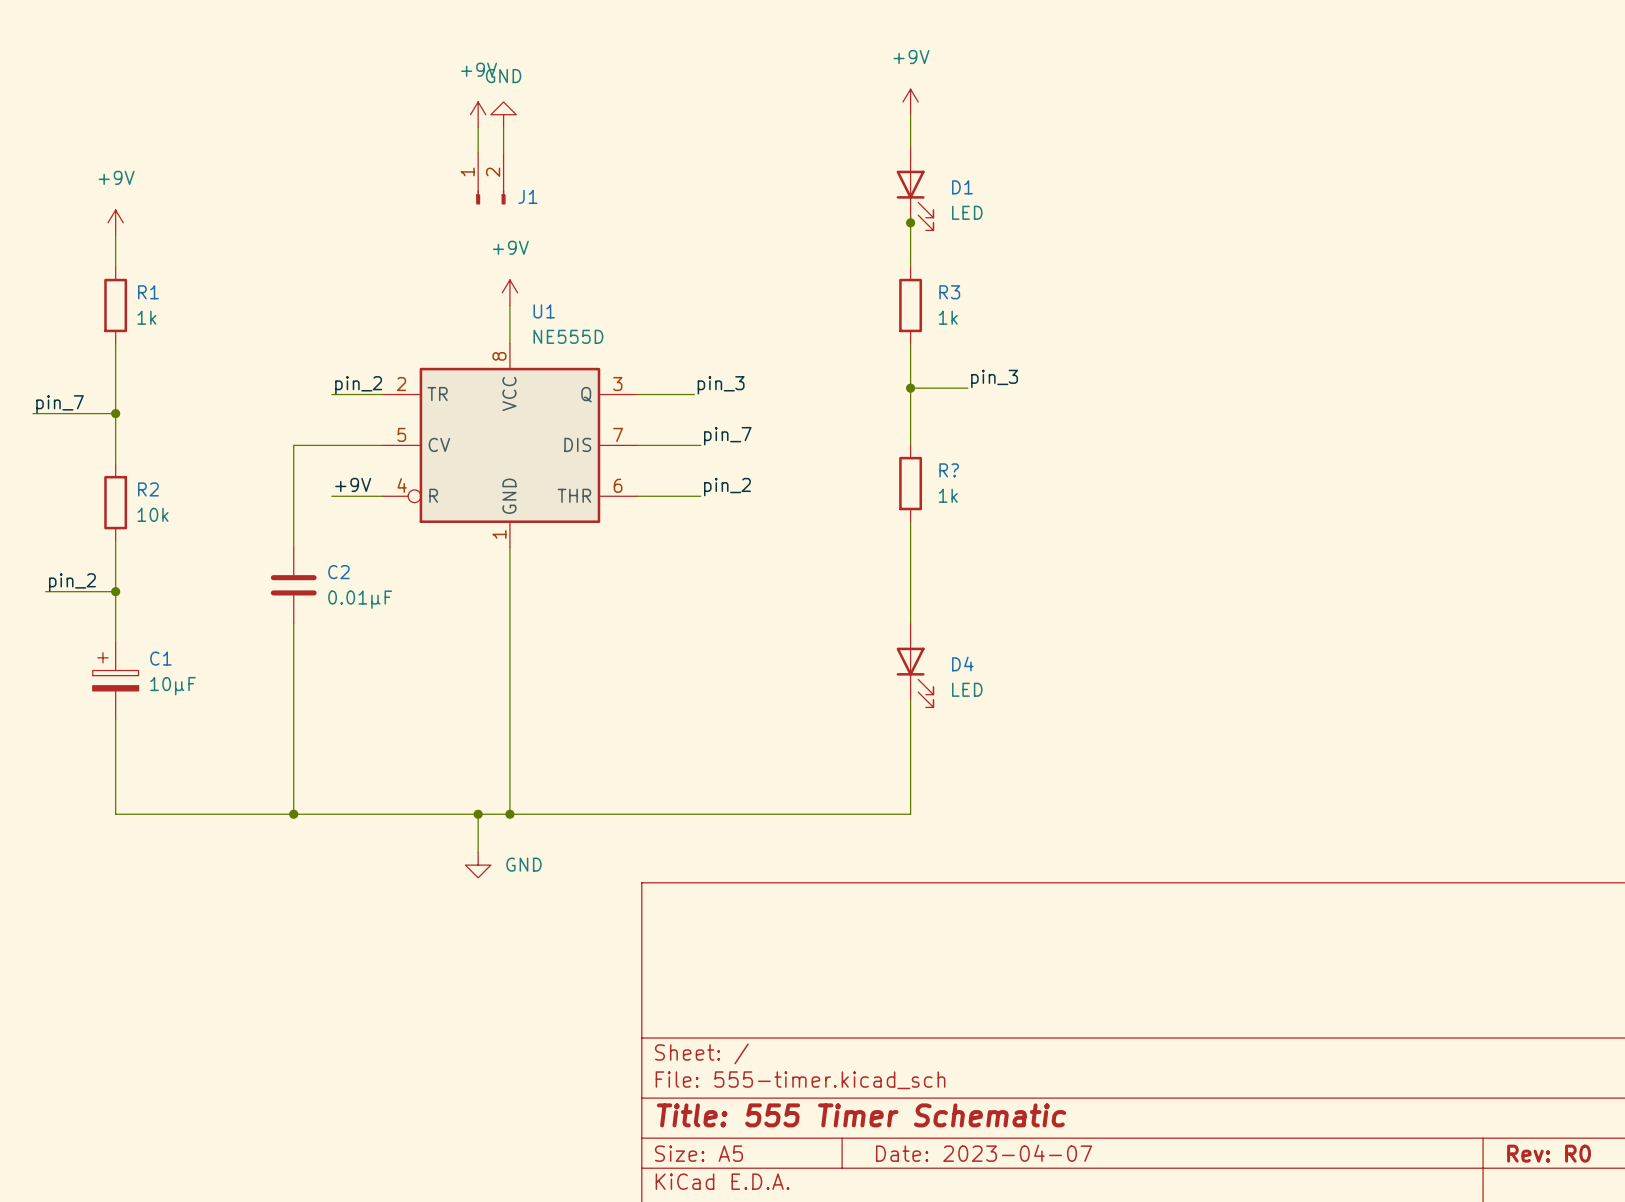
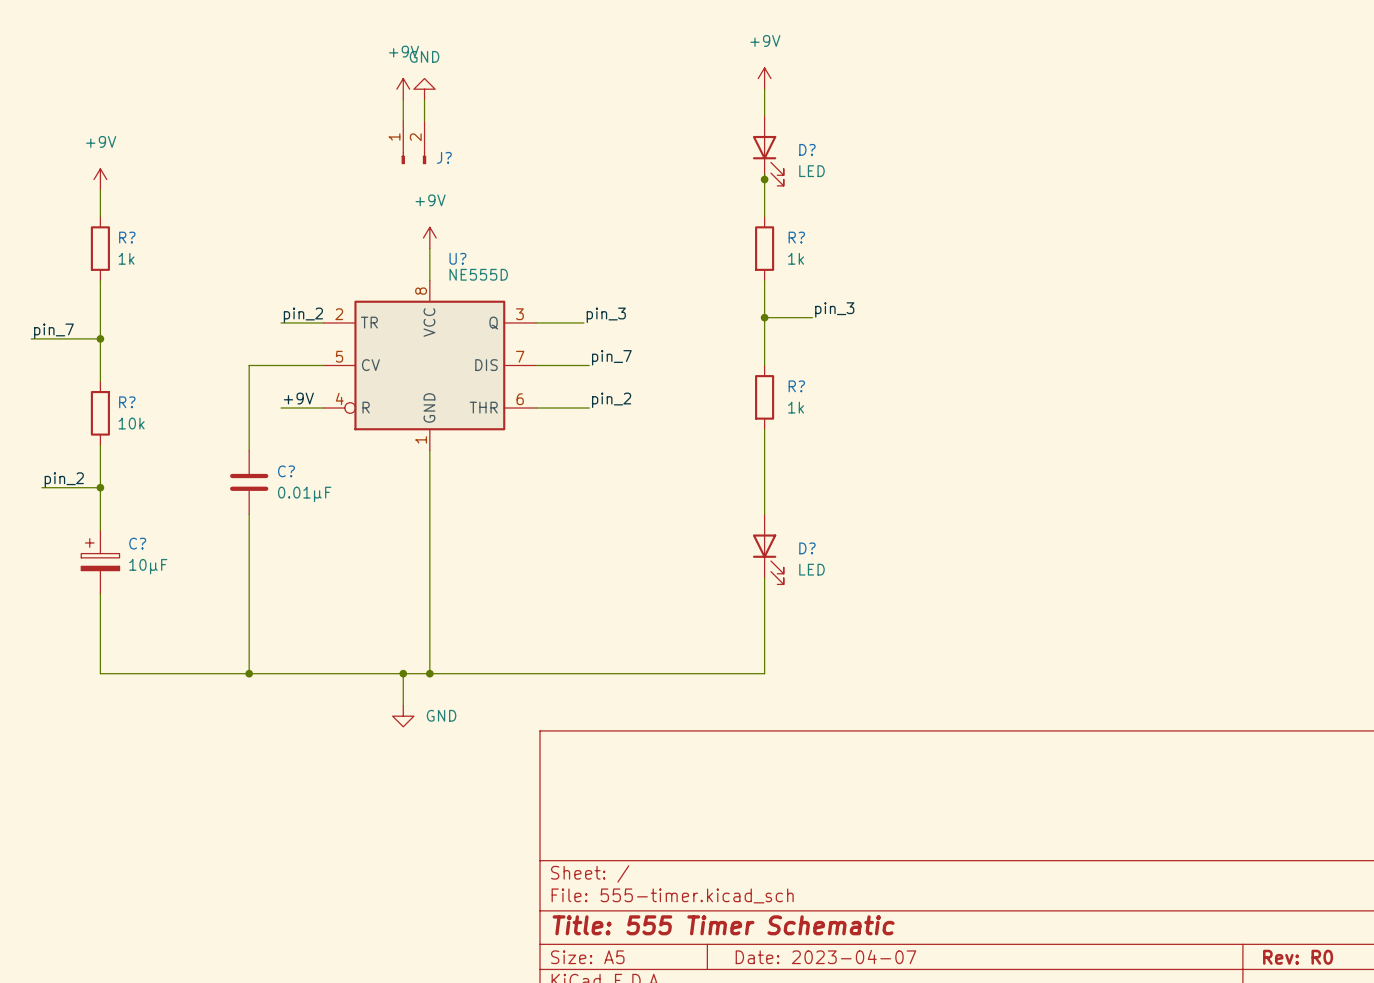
D1 name: D1 (962, 187) -> D? (807, 149)
J1 name: J1 (527, 196) -> J? (444, 157)
R1 name: R1 (148, 292) -> R? (127, 237)
R3 name: R3 (949, 292) -> R? (796, 237)
U1 name: U1 (544, 311) -> U? (457, 258)
R2 name: R2 (148, 489) -> R? (127, 402)
C2 name: C2 (338, 572) -> C? (286, 471)
C1 name: C1 (160, 658) -> C? (137, 543)
D4 name: D4 (962, 664) -> D? (807, 548)

